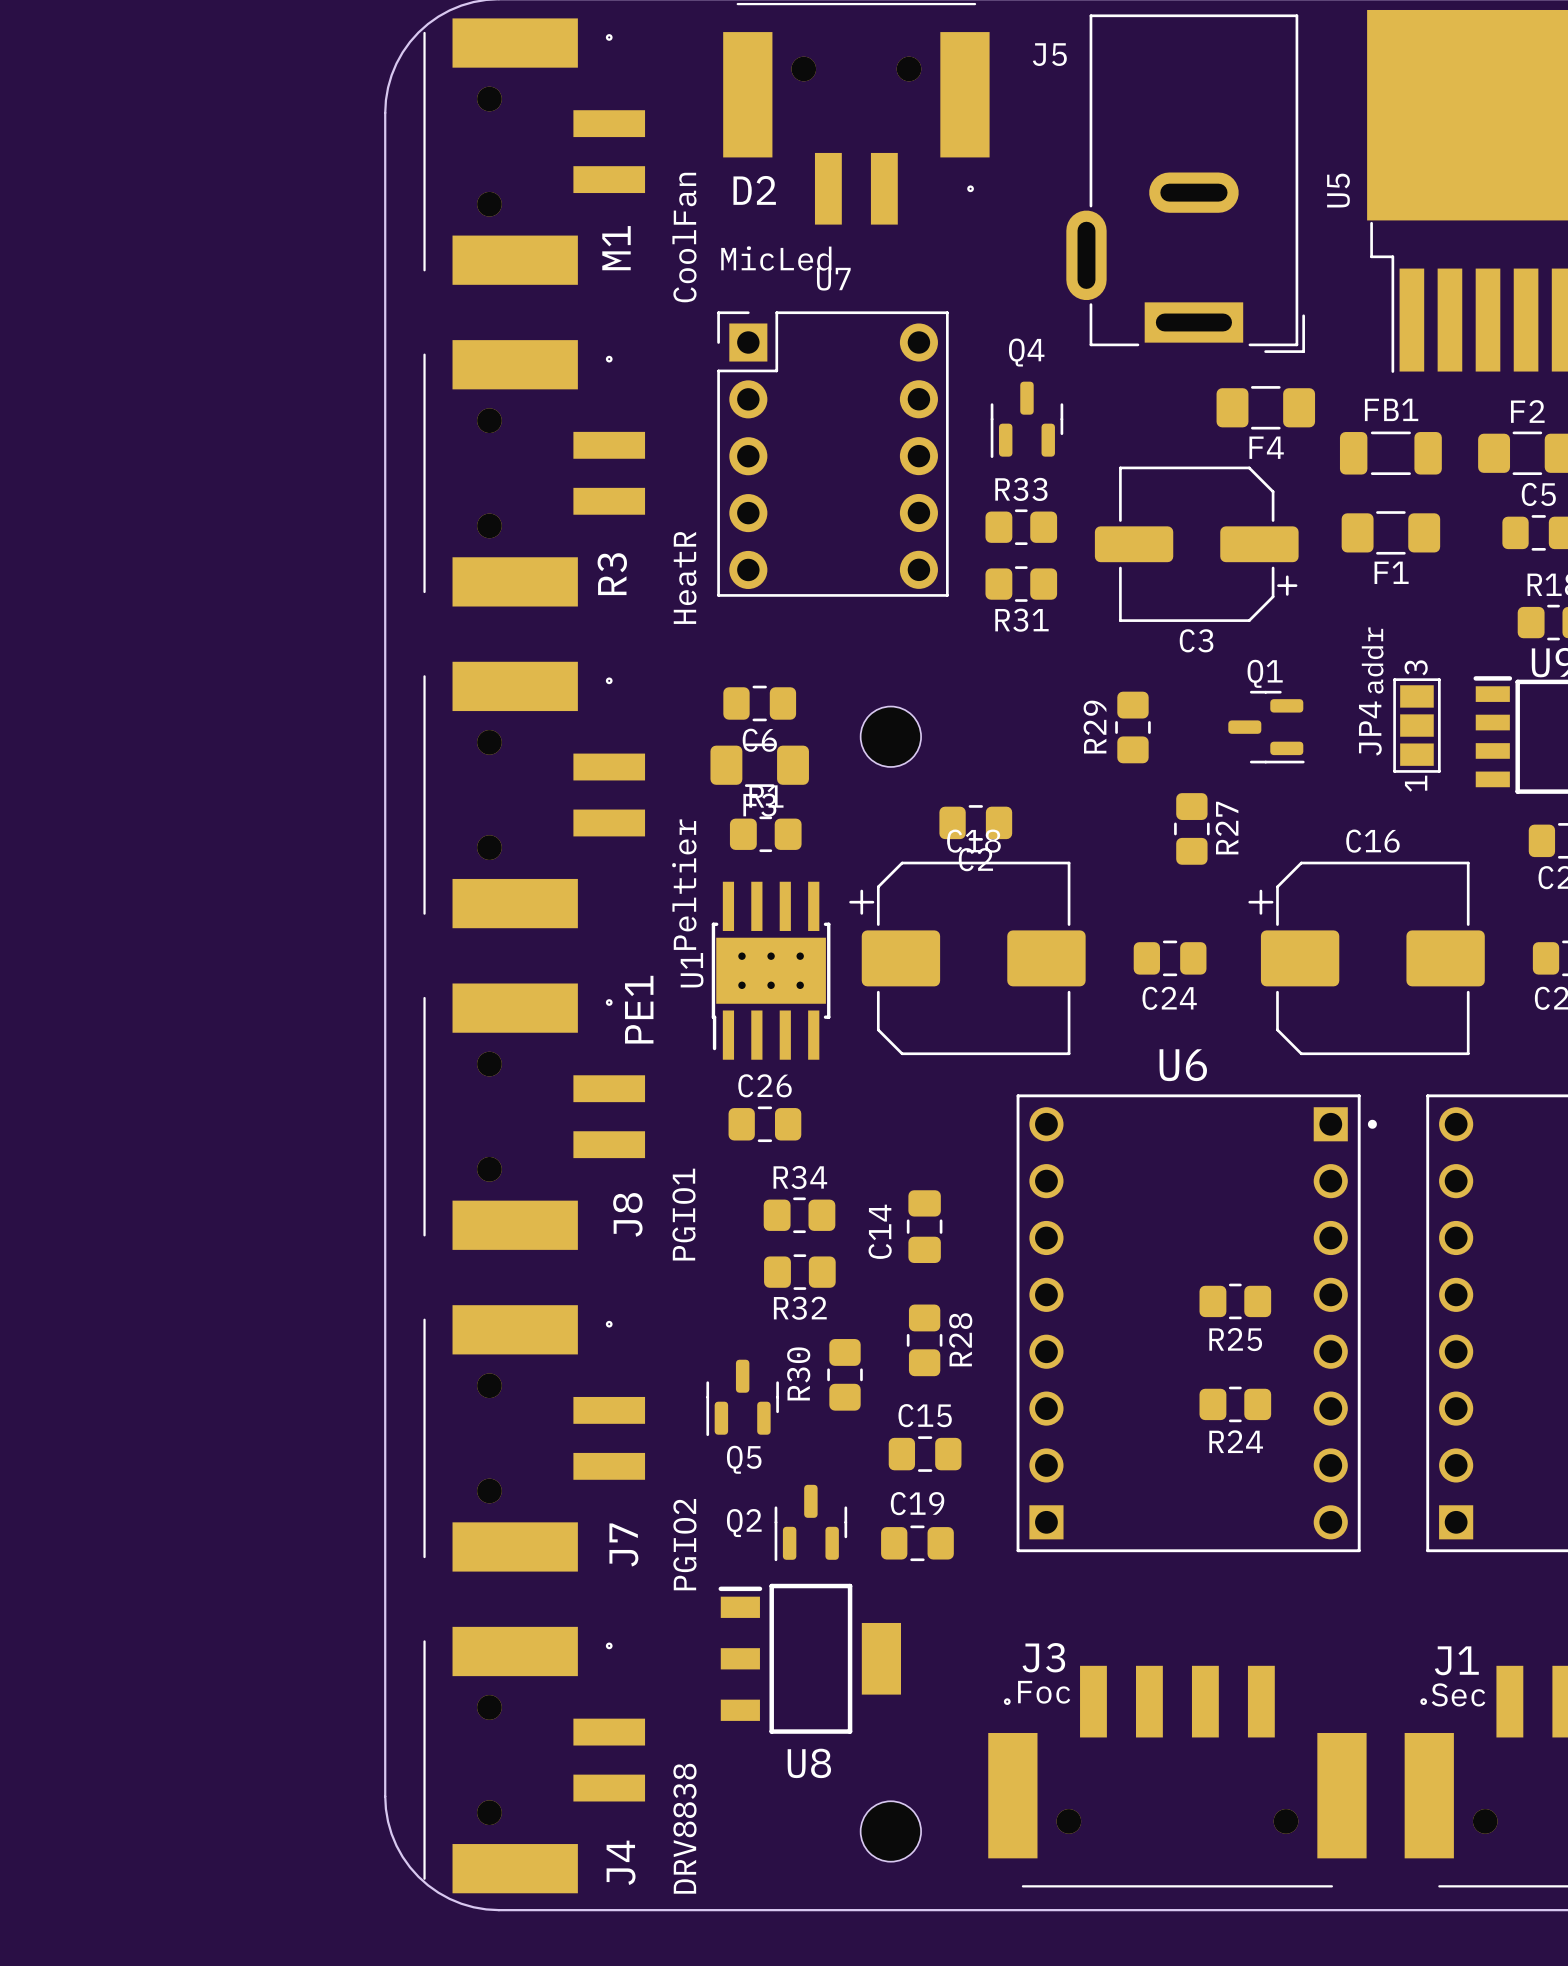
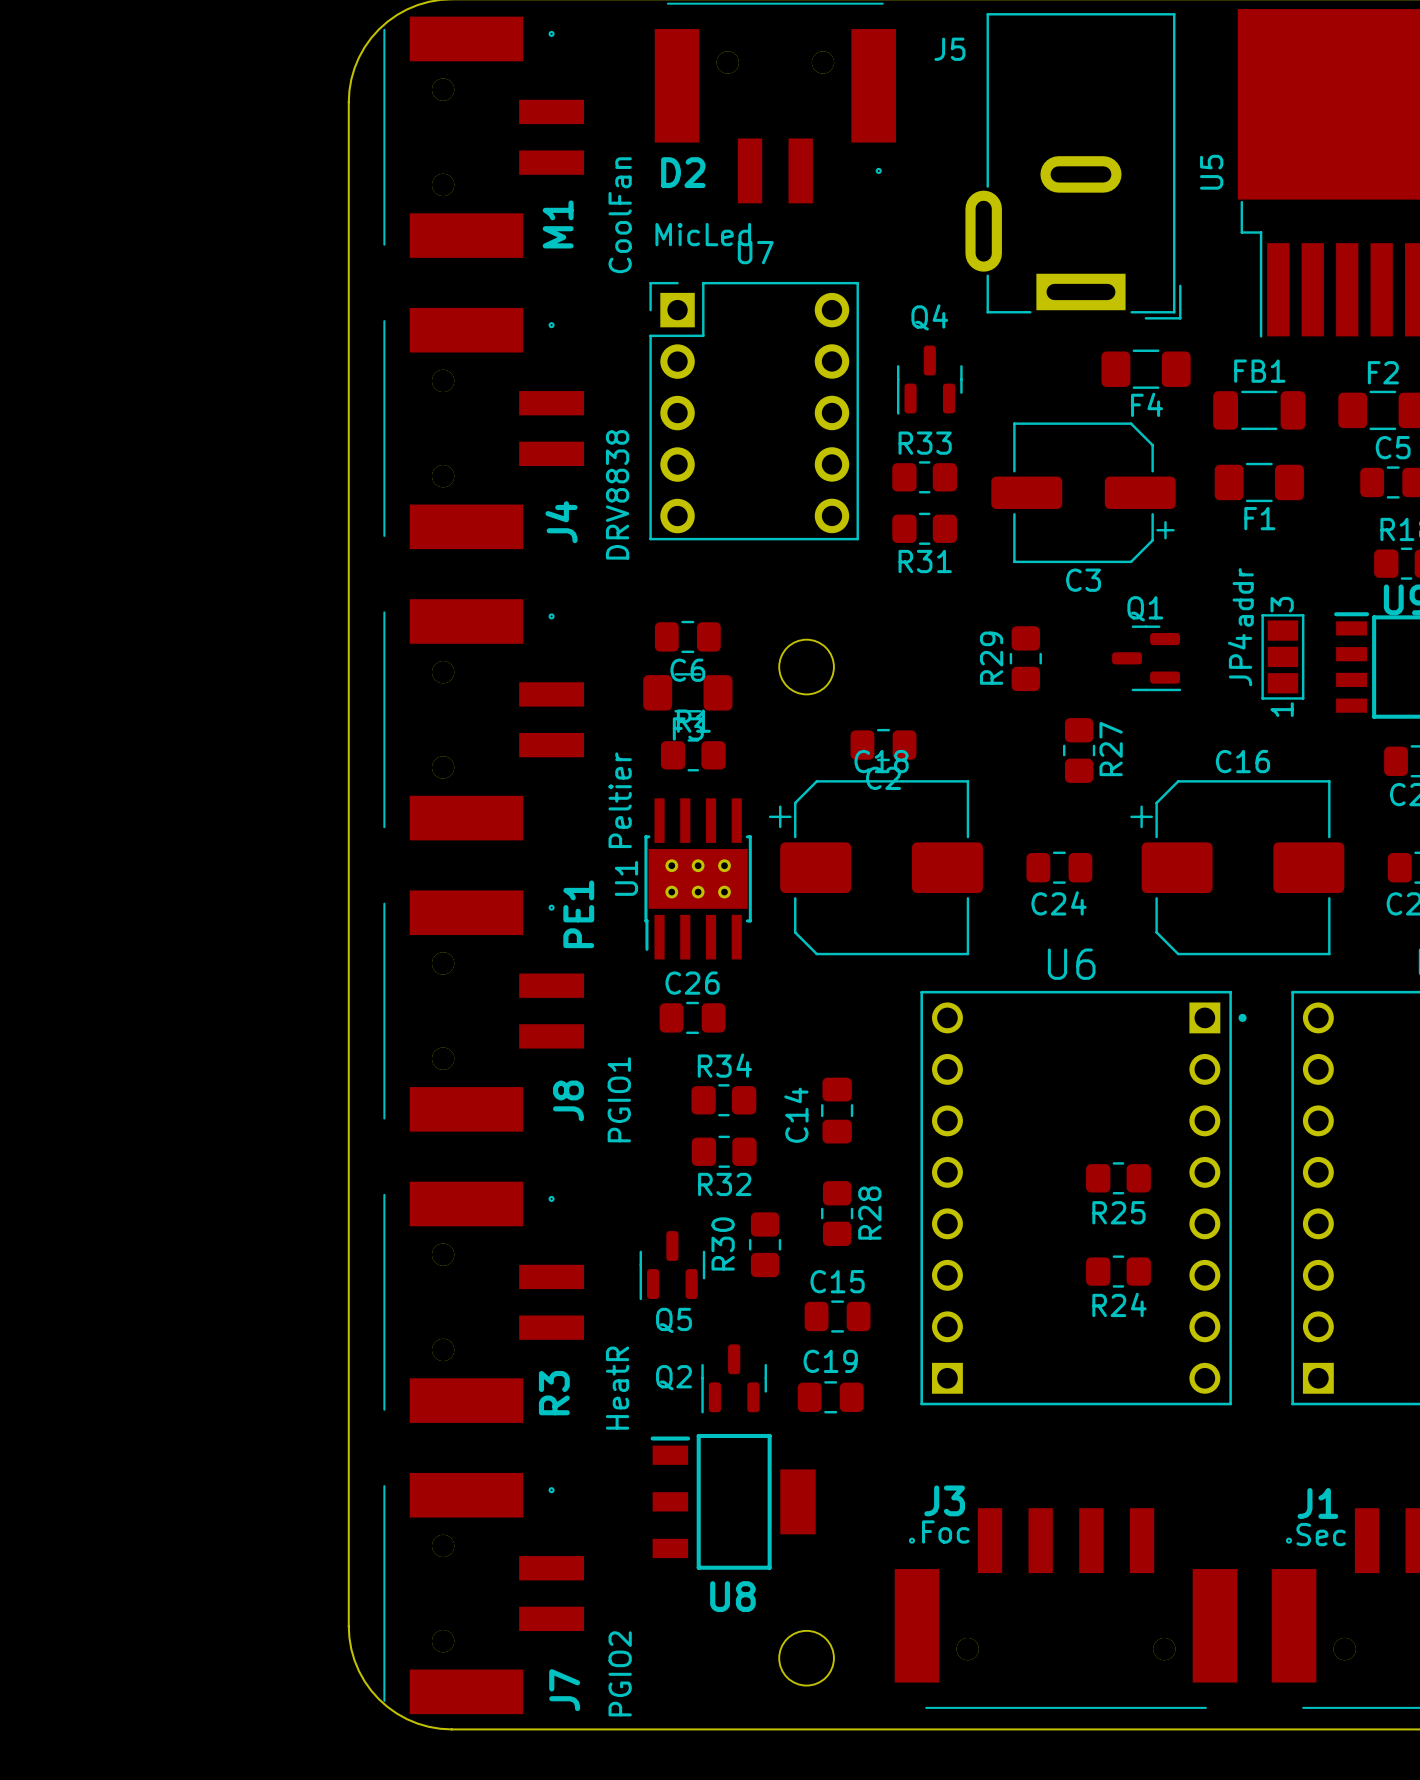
text: none -> DRV8838 (617, 494)
R3 name: R3 (612, 574) -> J4 (561, 522)
text: HeatR (685, 577) -> none
J7 name: J7 (623, 1544) -> R3 (554, 1393)
text: PGIO2 (684, 1544) -> HeatR (617, 1388)
text: DRV8838 (684, 1828) -> PGIO2 (620, 1673)
J4 name: J4 (621, 1862) -> J7 (564, 1690)

